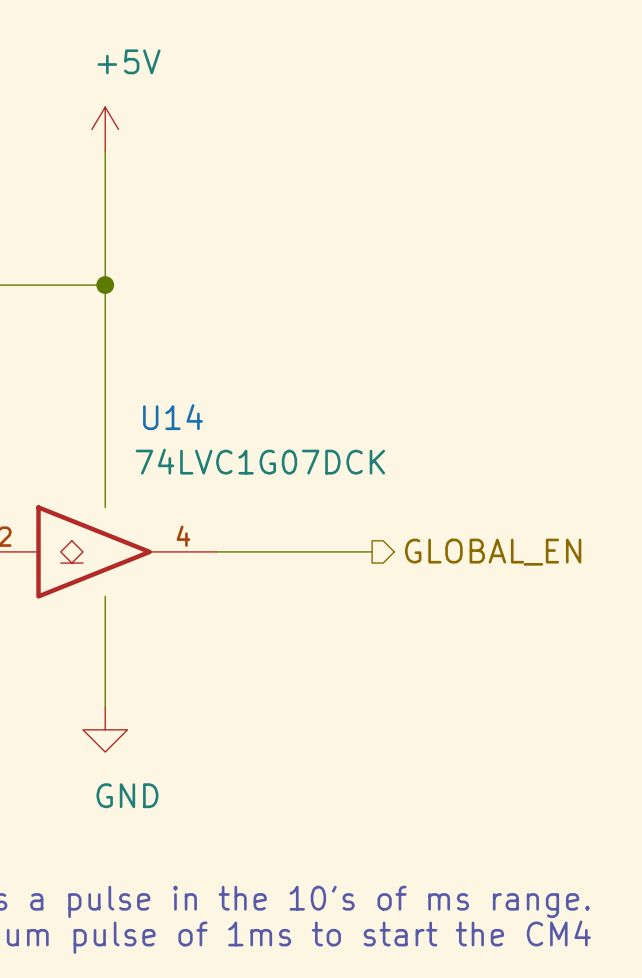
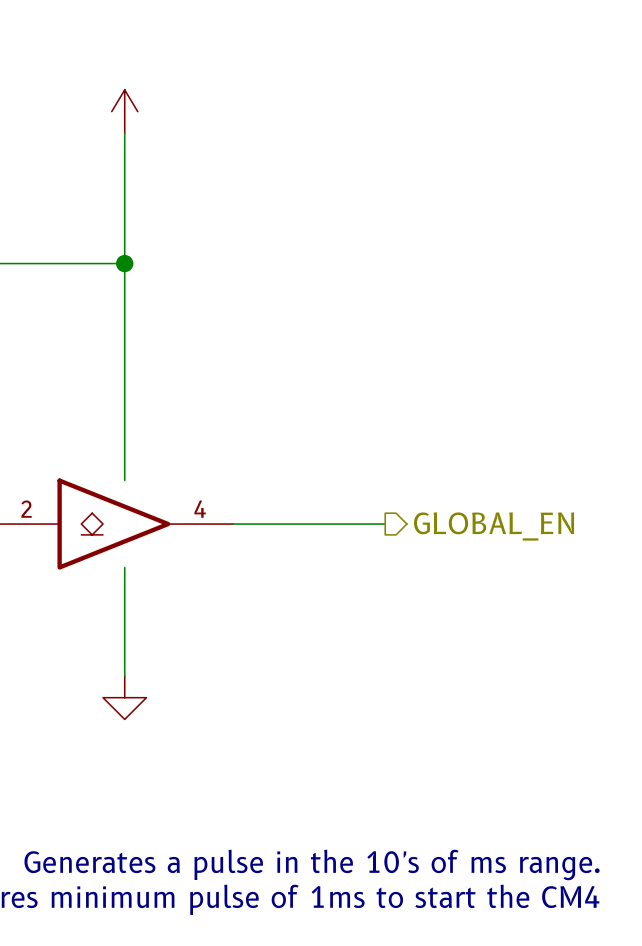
power symbol text: +5V (129, 61) -> none
U14 name: U14 (173, 417) -> none
U14 value: 74LVC1G07DCK (260, 461) -> none
power symbol text: GND (127, 795) -> none

